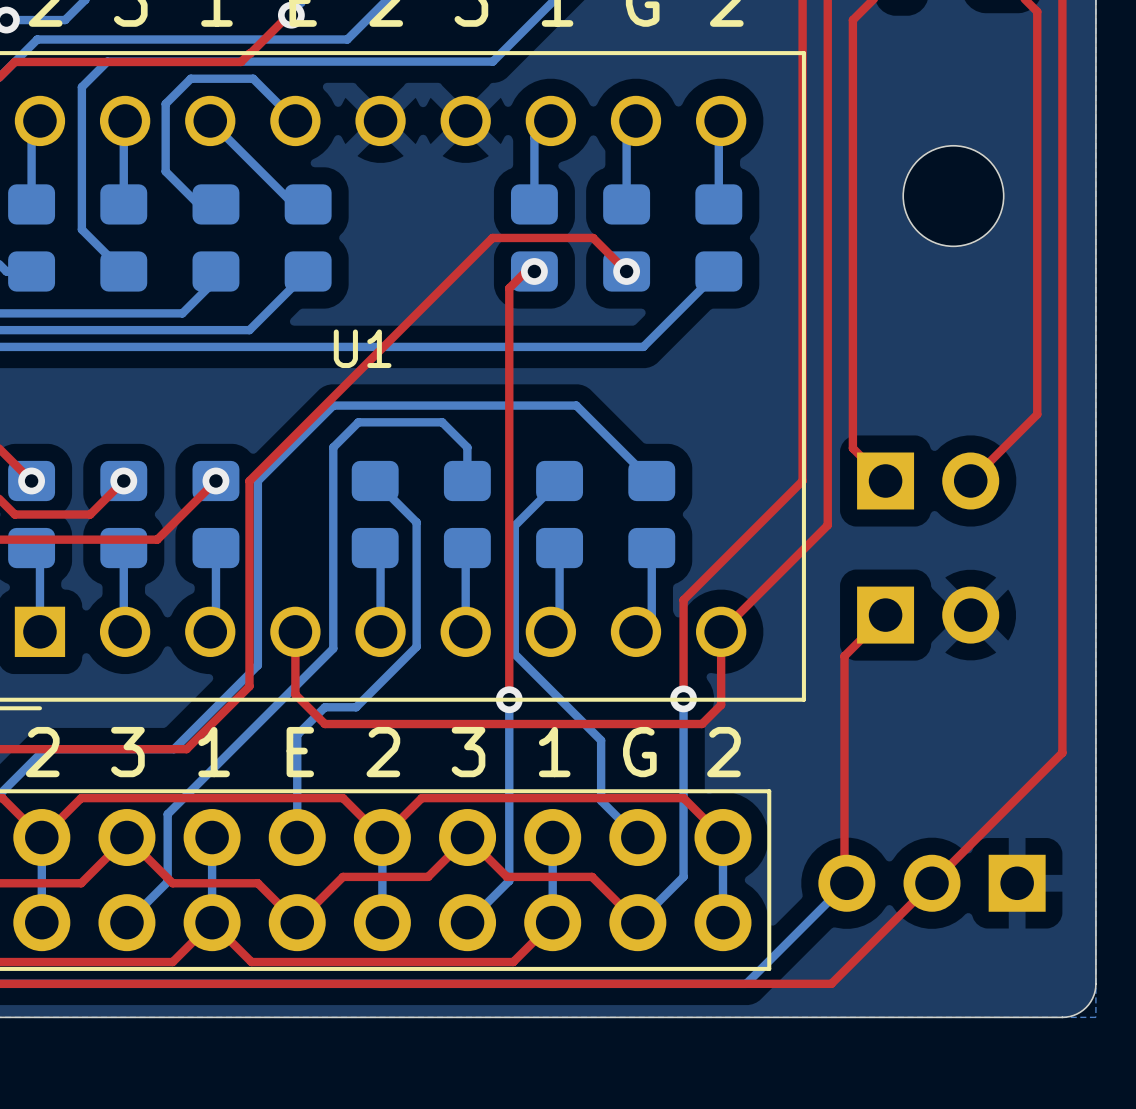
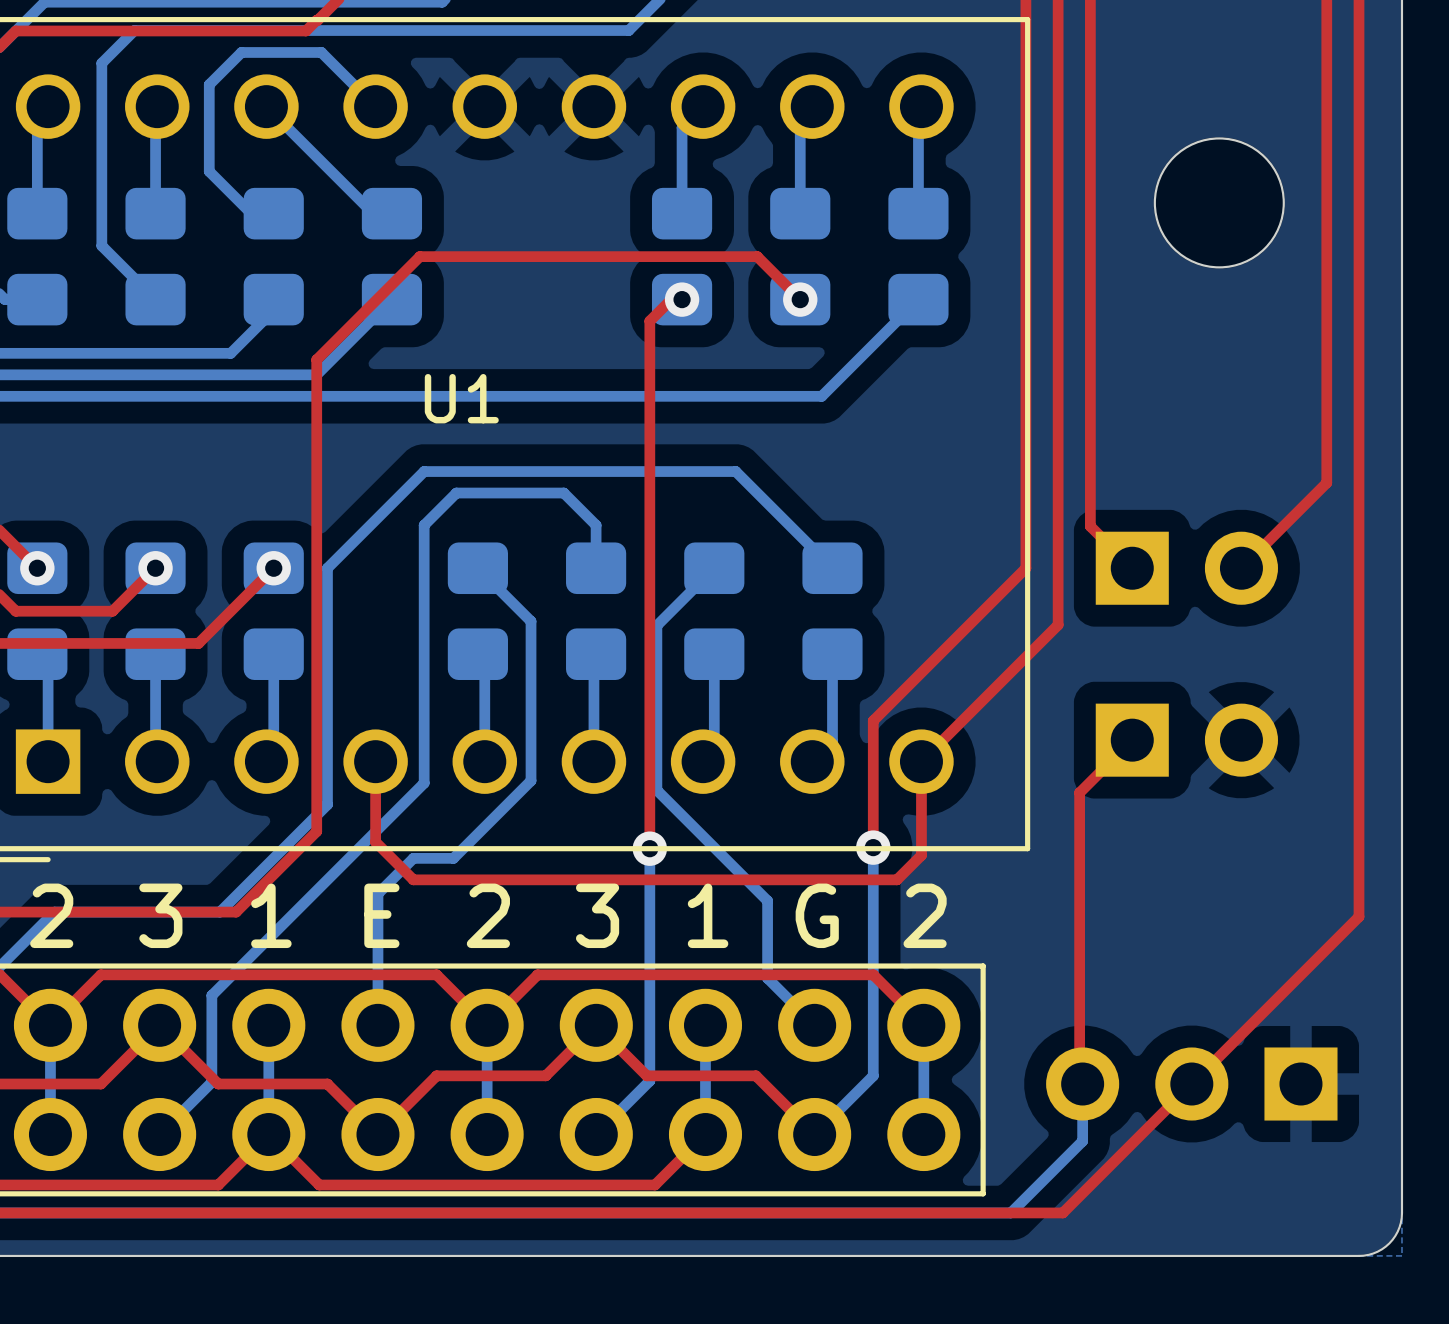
top track: (492, 237) (249, 480) -> (628, 256) (419, 256) (316, 359) (316, 568)
bottom track: (846, 883) (746, 983) -> (1082, 1084) (1082, 1141) (1010, 1212) (953, 1212)

